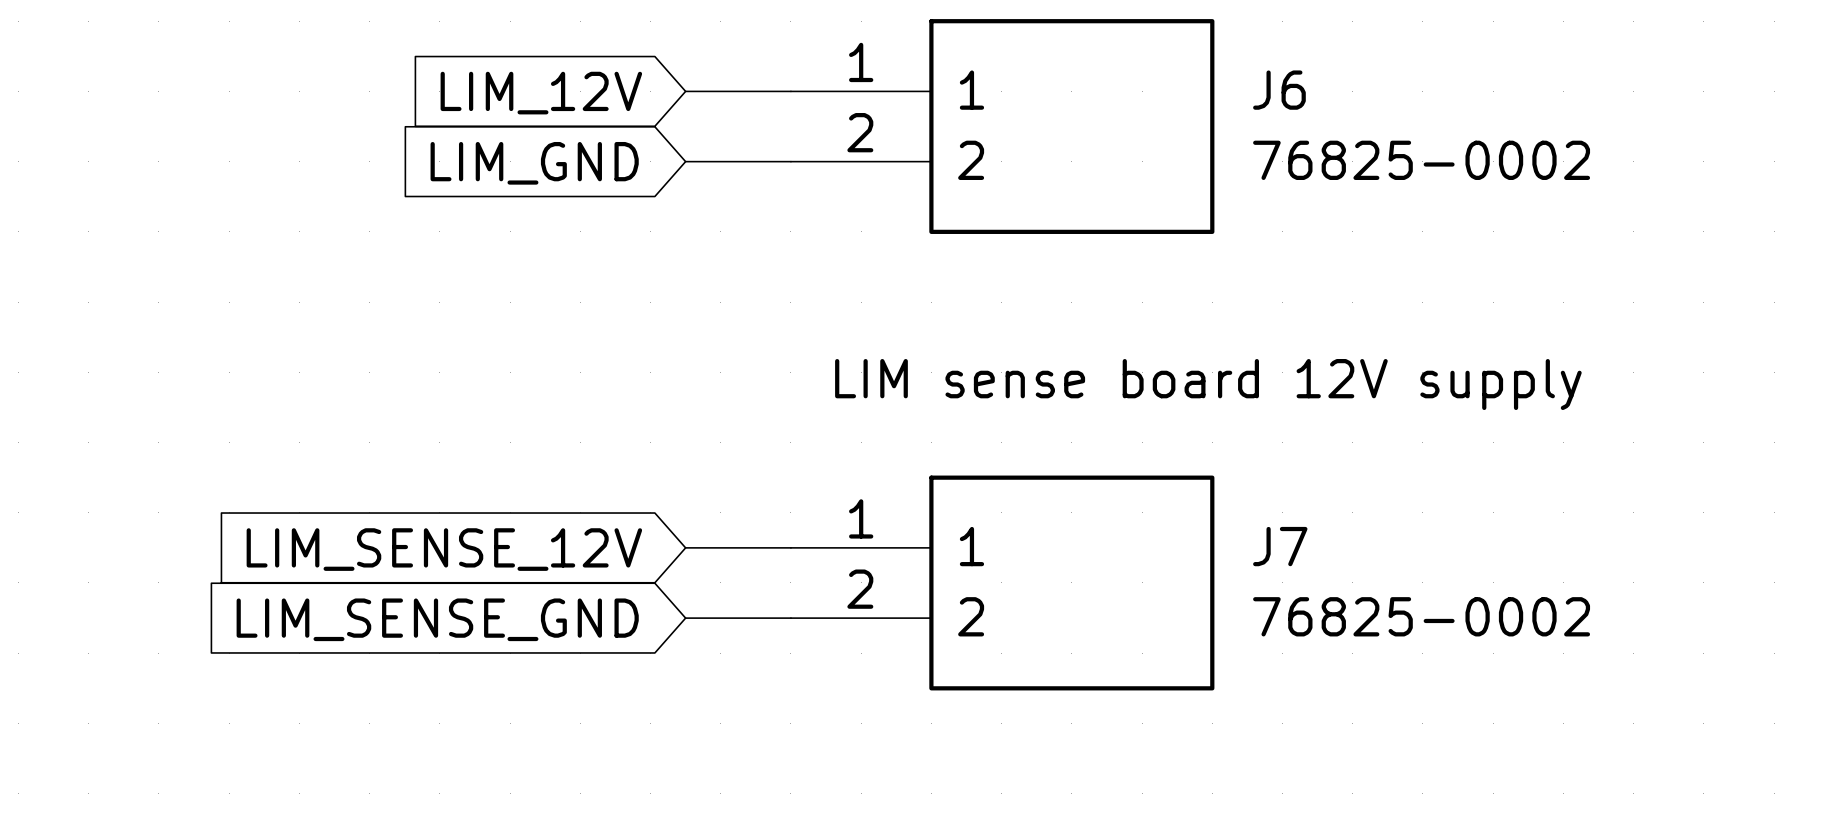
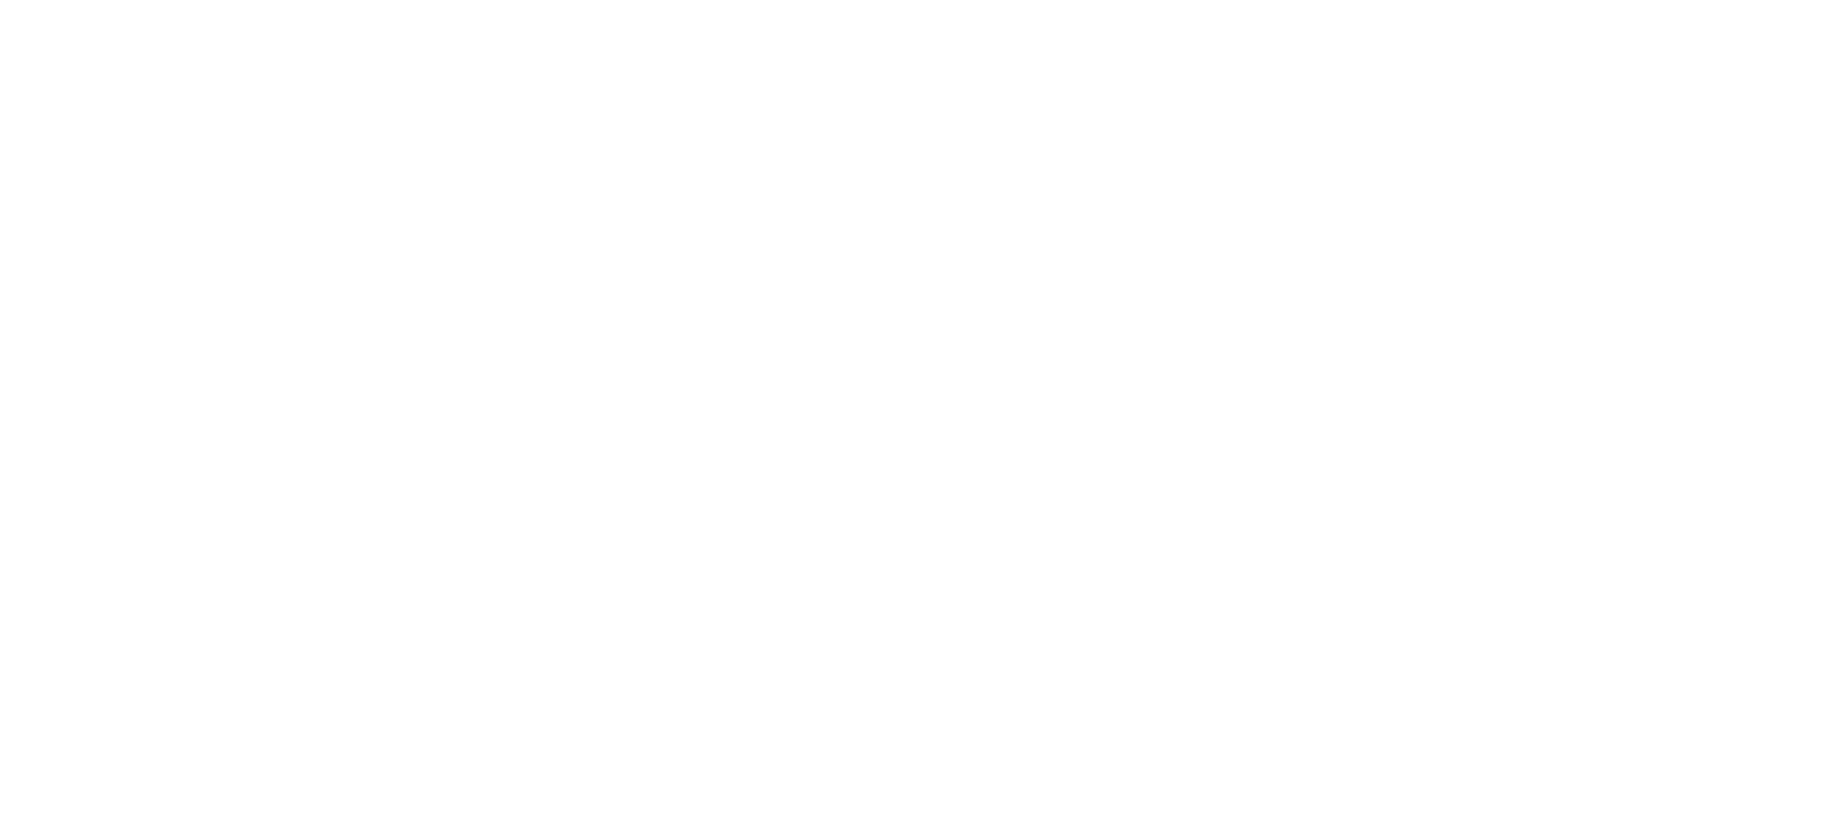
wire: (685, 91) (790, 91) -> none
global label: LIM_12V (541, 93) -> none
J6: 76825-0002 (1002, 126) -> none
wire: (685, 161) (790, 161) -> none
global label: LIM_GND (534, 163) -> none
text: LIM sense board 12V supply (1208, 384) -> none
wire: (685, 547) (790, 547) -> none
global label: LIM_SENSE_12V (444, 549) -> none
J7: 76825-0002 (1002, 582) -> none
wire: (685, 618) (790, 618) -> none
global label: LIM_SENSE_GND (437, 619) -> none

